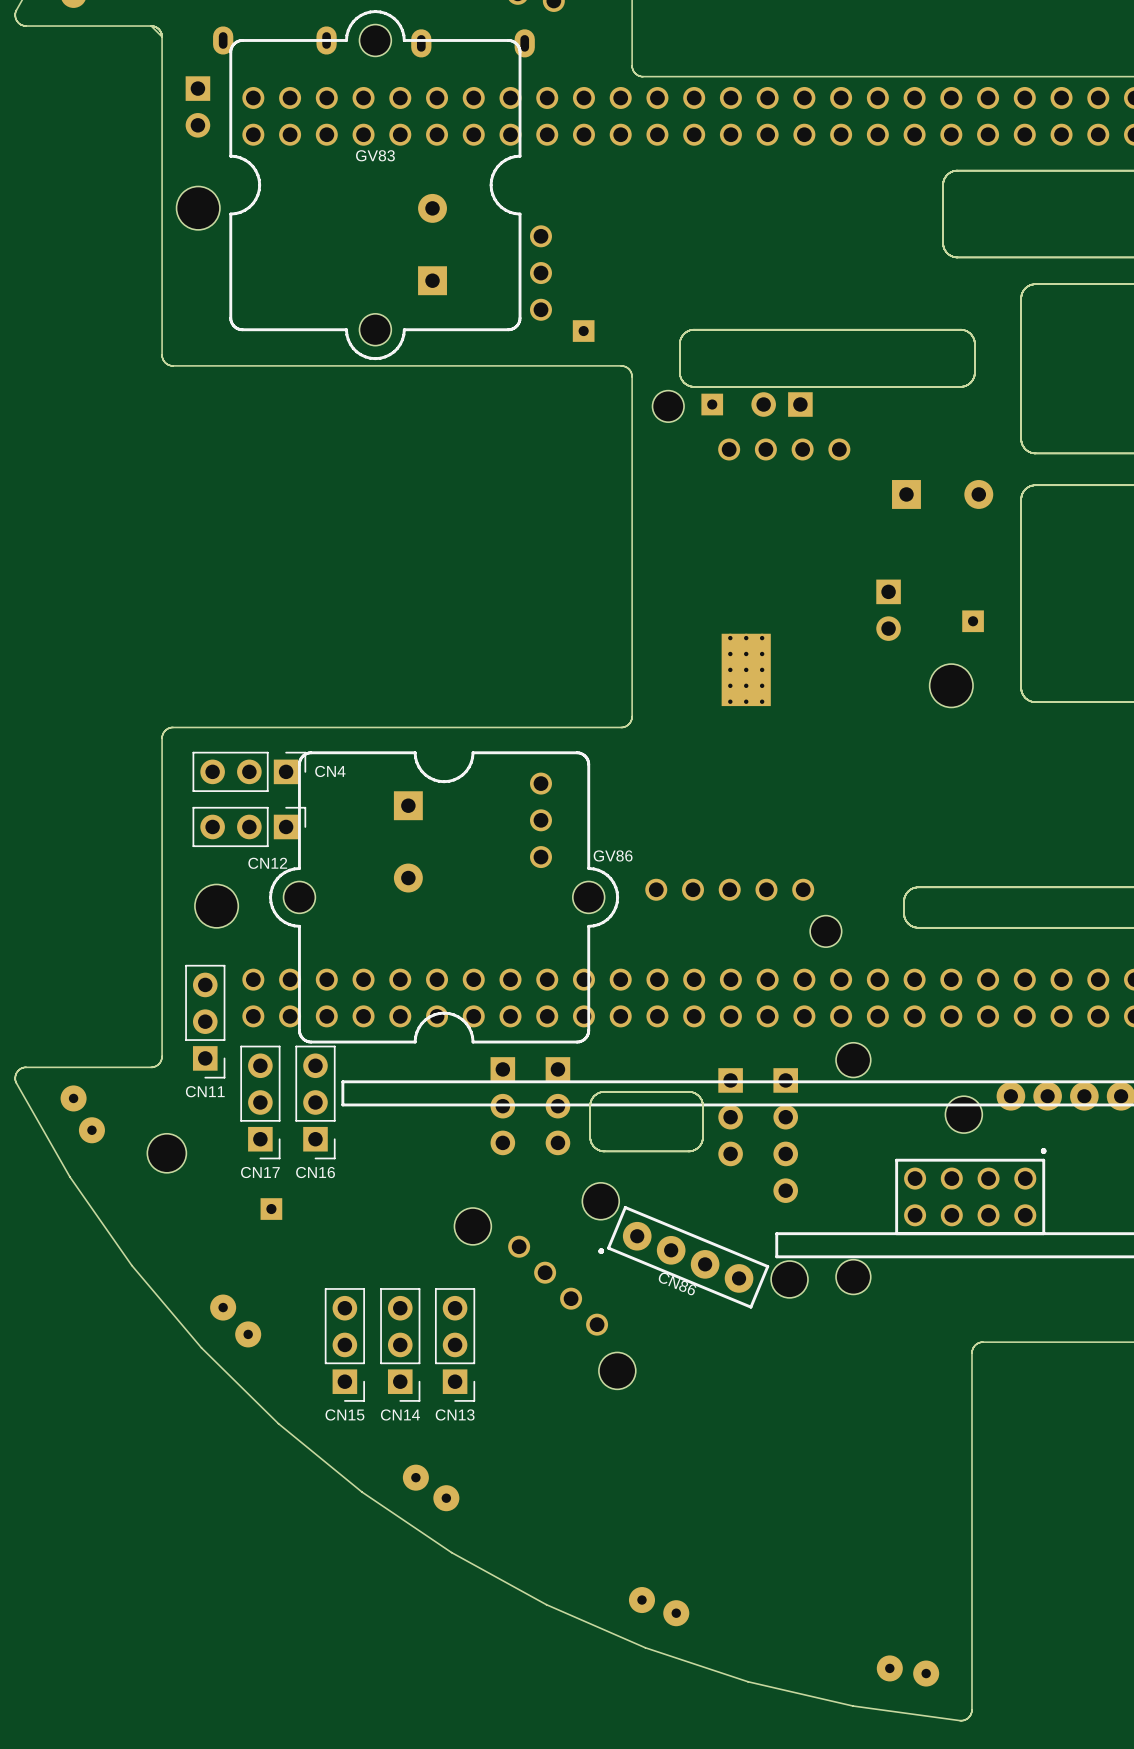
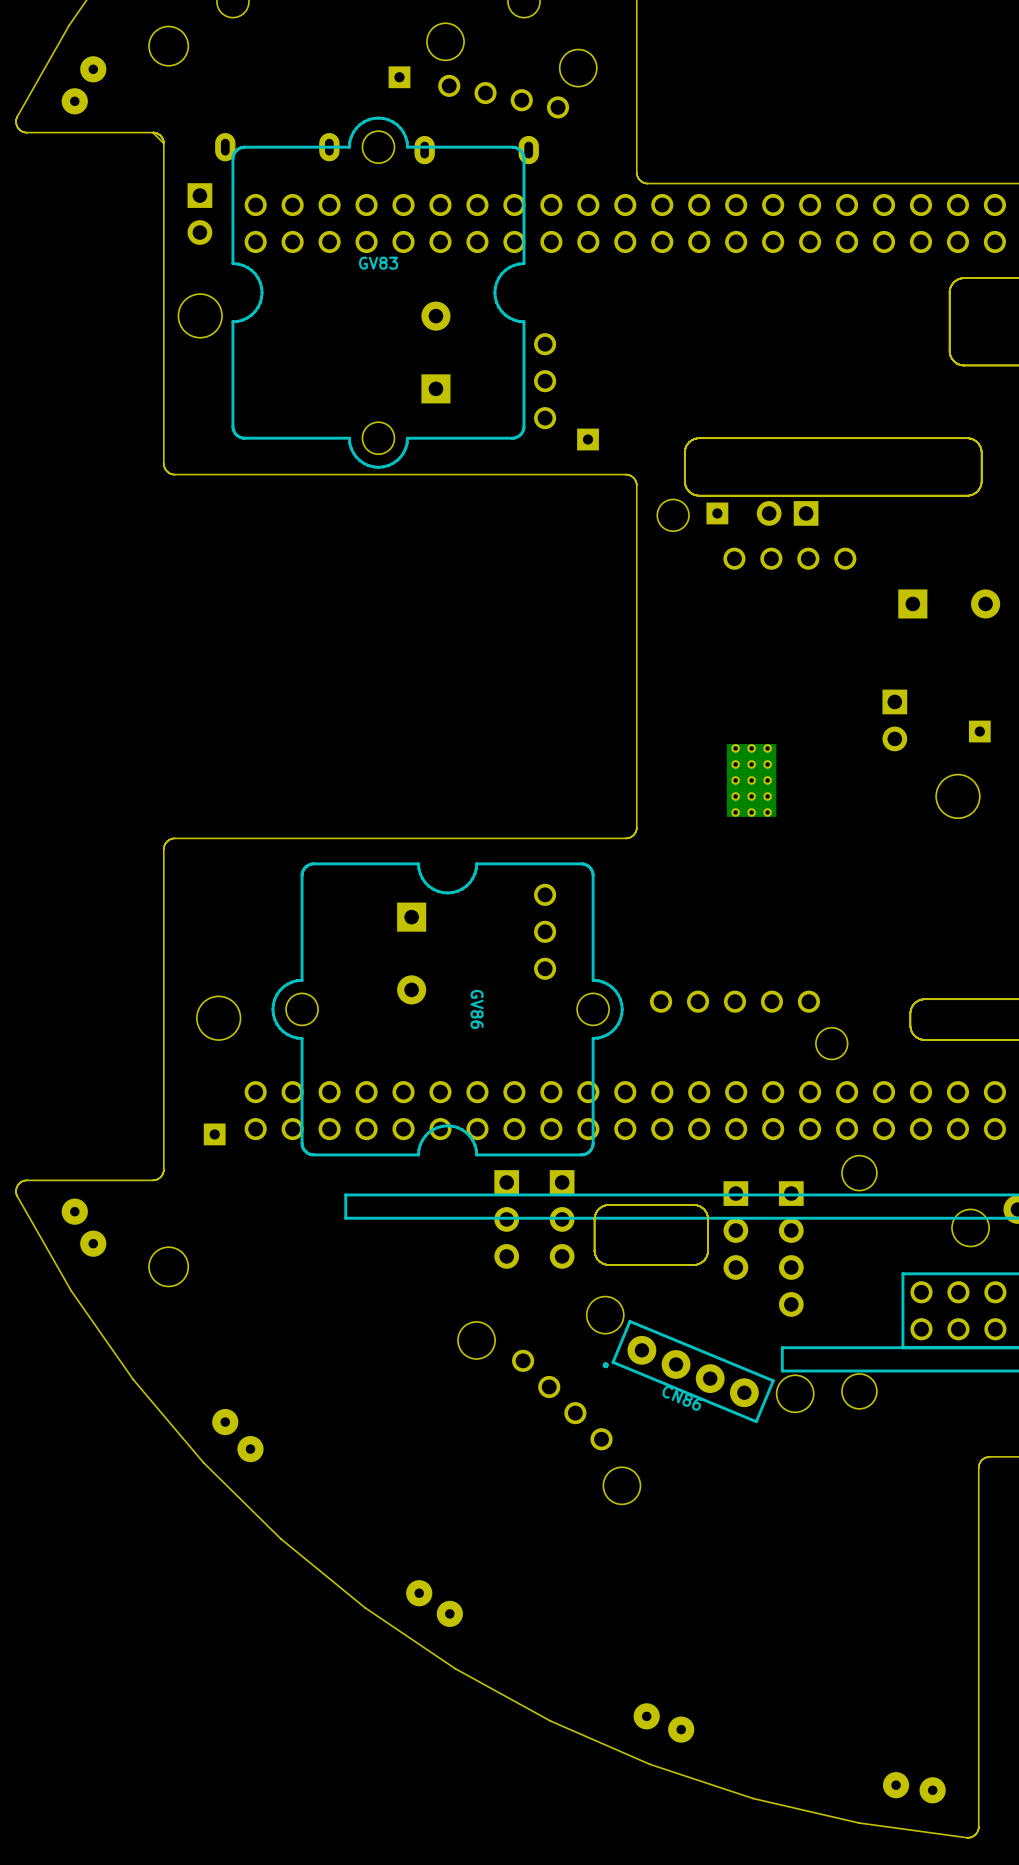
CN4: (249, 771) -> none
CN12: (249, 826) -> none
GV86 name rotation: 0° (613, 855) -> 90° clockwise (477, 1009)
GV86 name position: GV86 (613, 855) -> GV86 (477, 1009)
CN11: (205, 1021) -> none
CN17: (260, 1102) -> none
CN16: (315, 1102) -> none
part position: (271, 1209) -> (214, 1134)
CN15: (344, 1344) -> none
CN14: (400, 1344) -> none
CN13: (455, 1344) -> none

